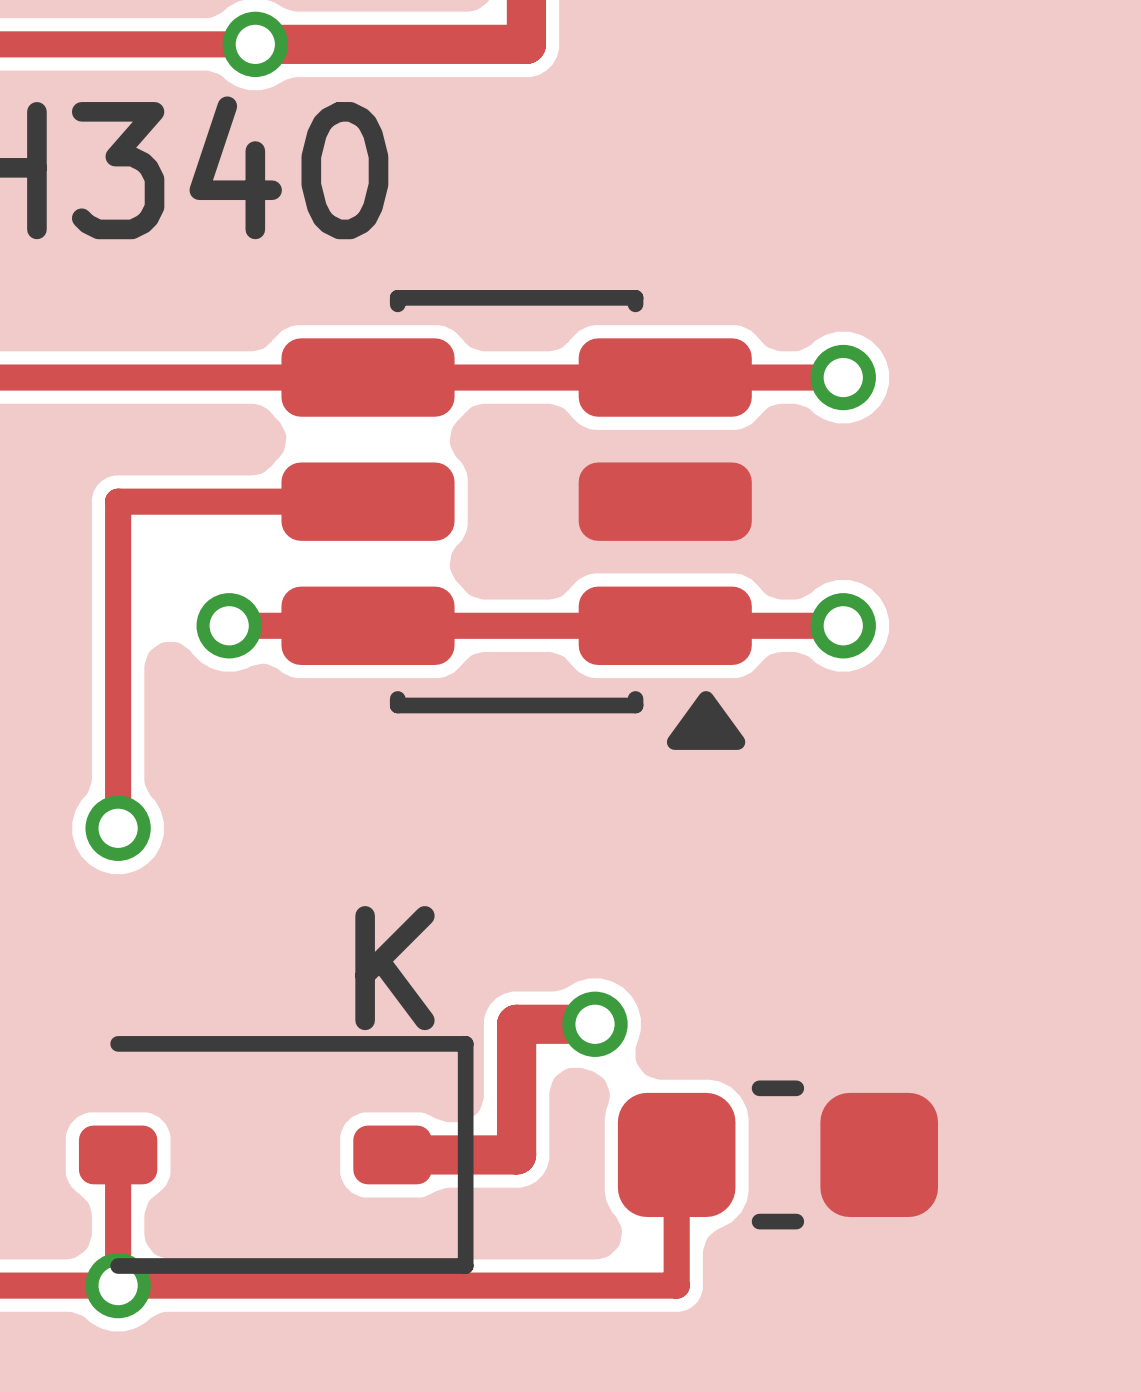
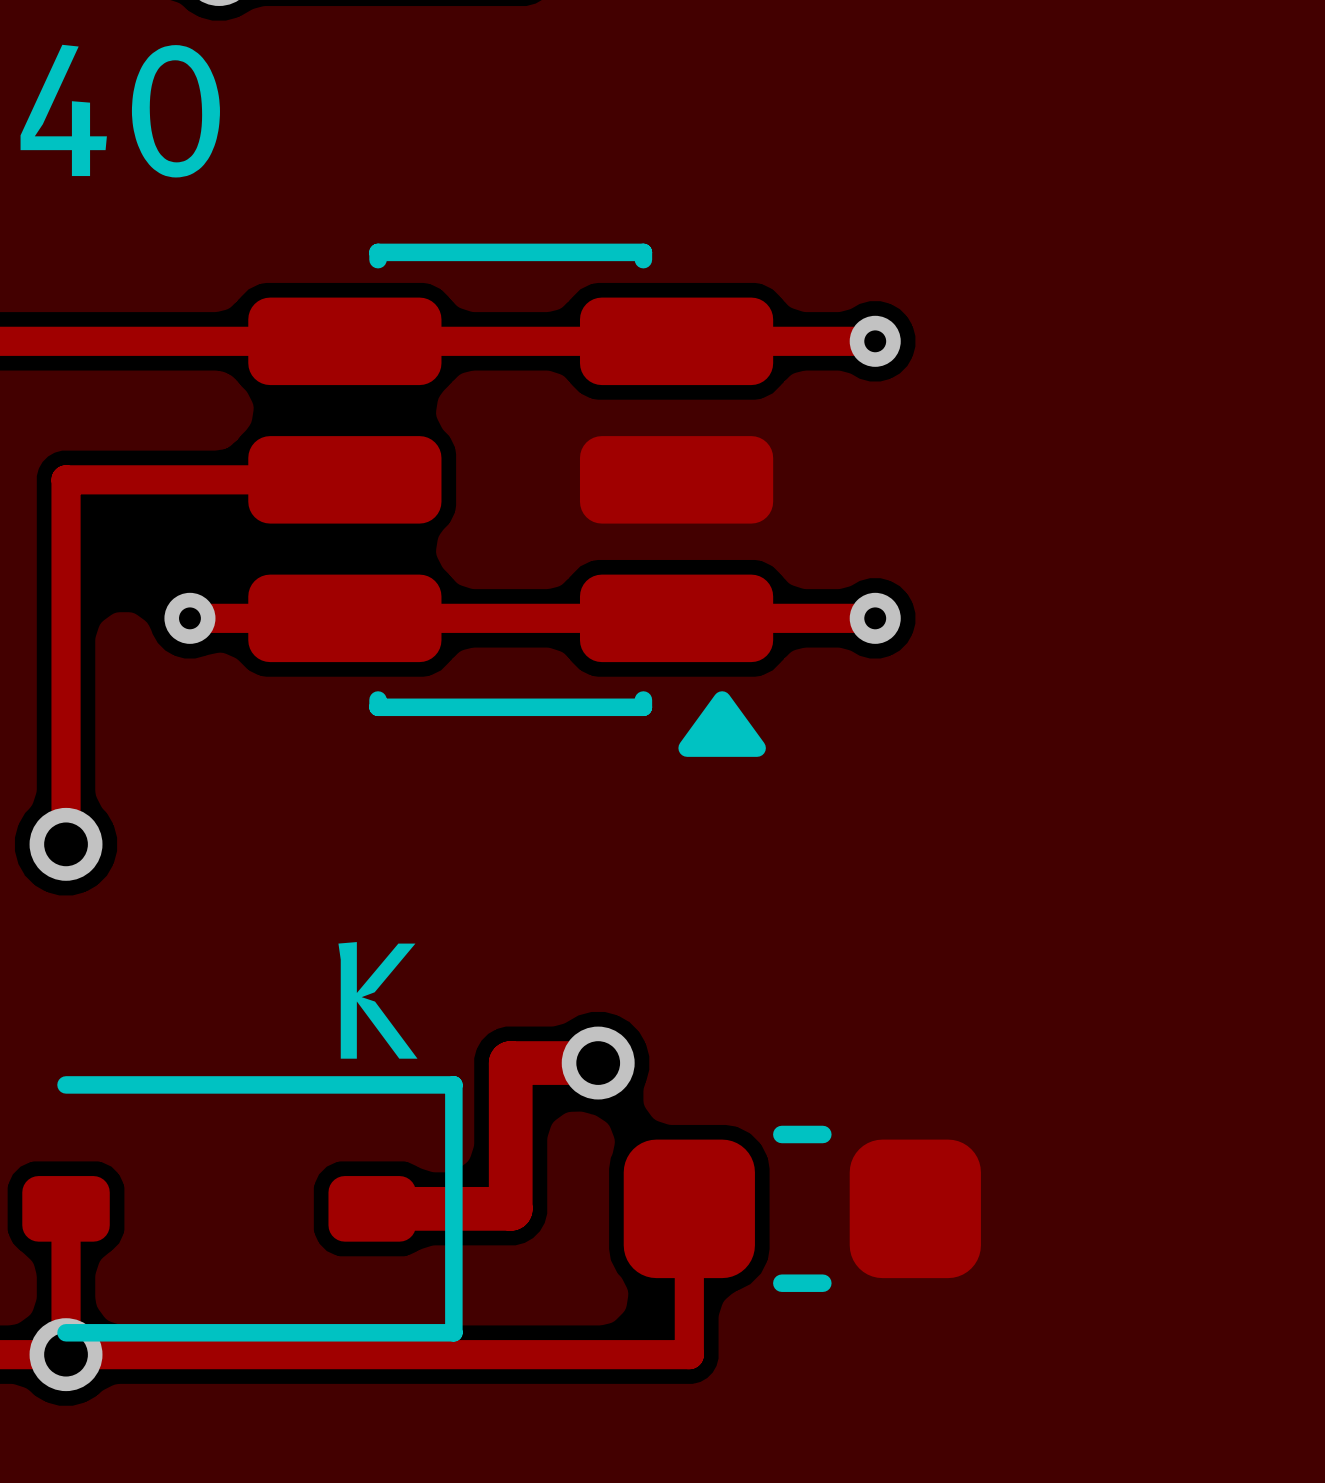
via size: [810, 344, 876, 411] -> [849, 315, 901, 367]
via size: [196, 593, 262, 659] -> [164, 592, 216, 644]
via size: [810, 593, 876, 659] -> [849, 592, 901, 644]

